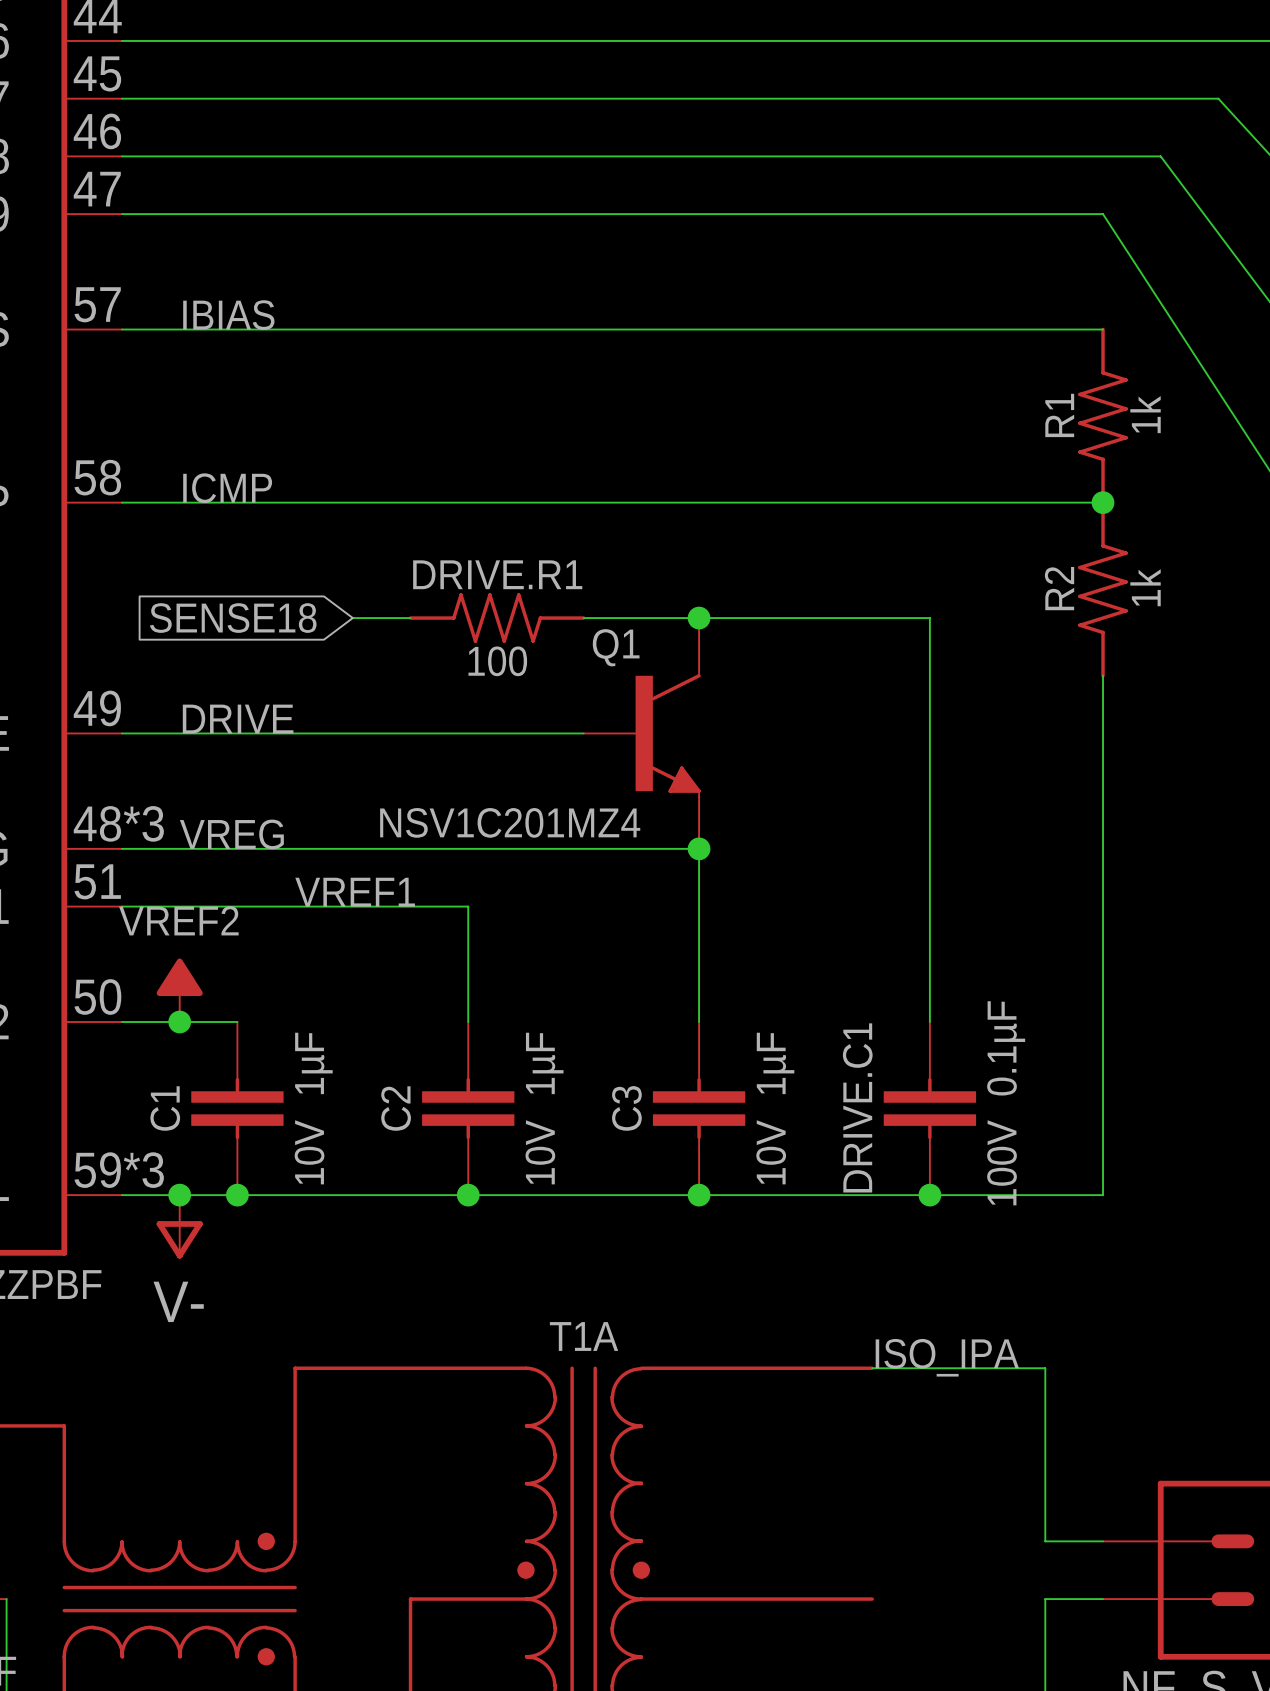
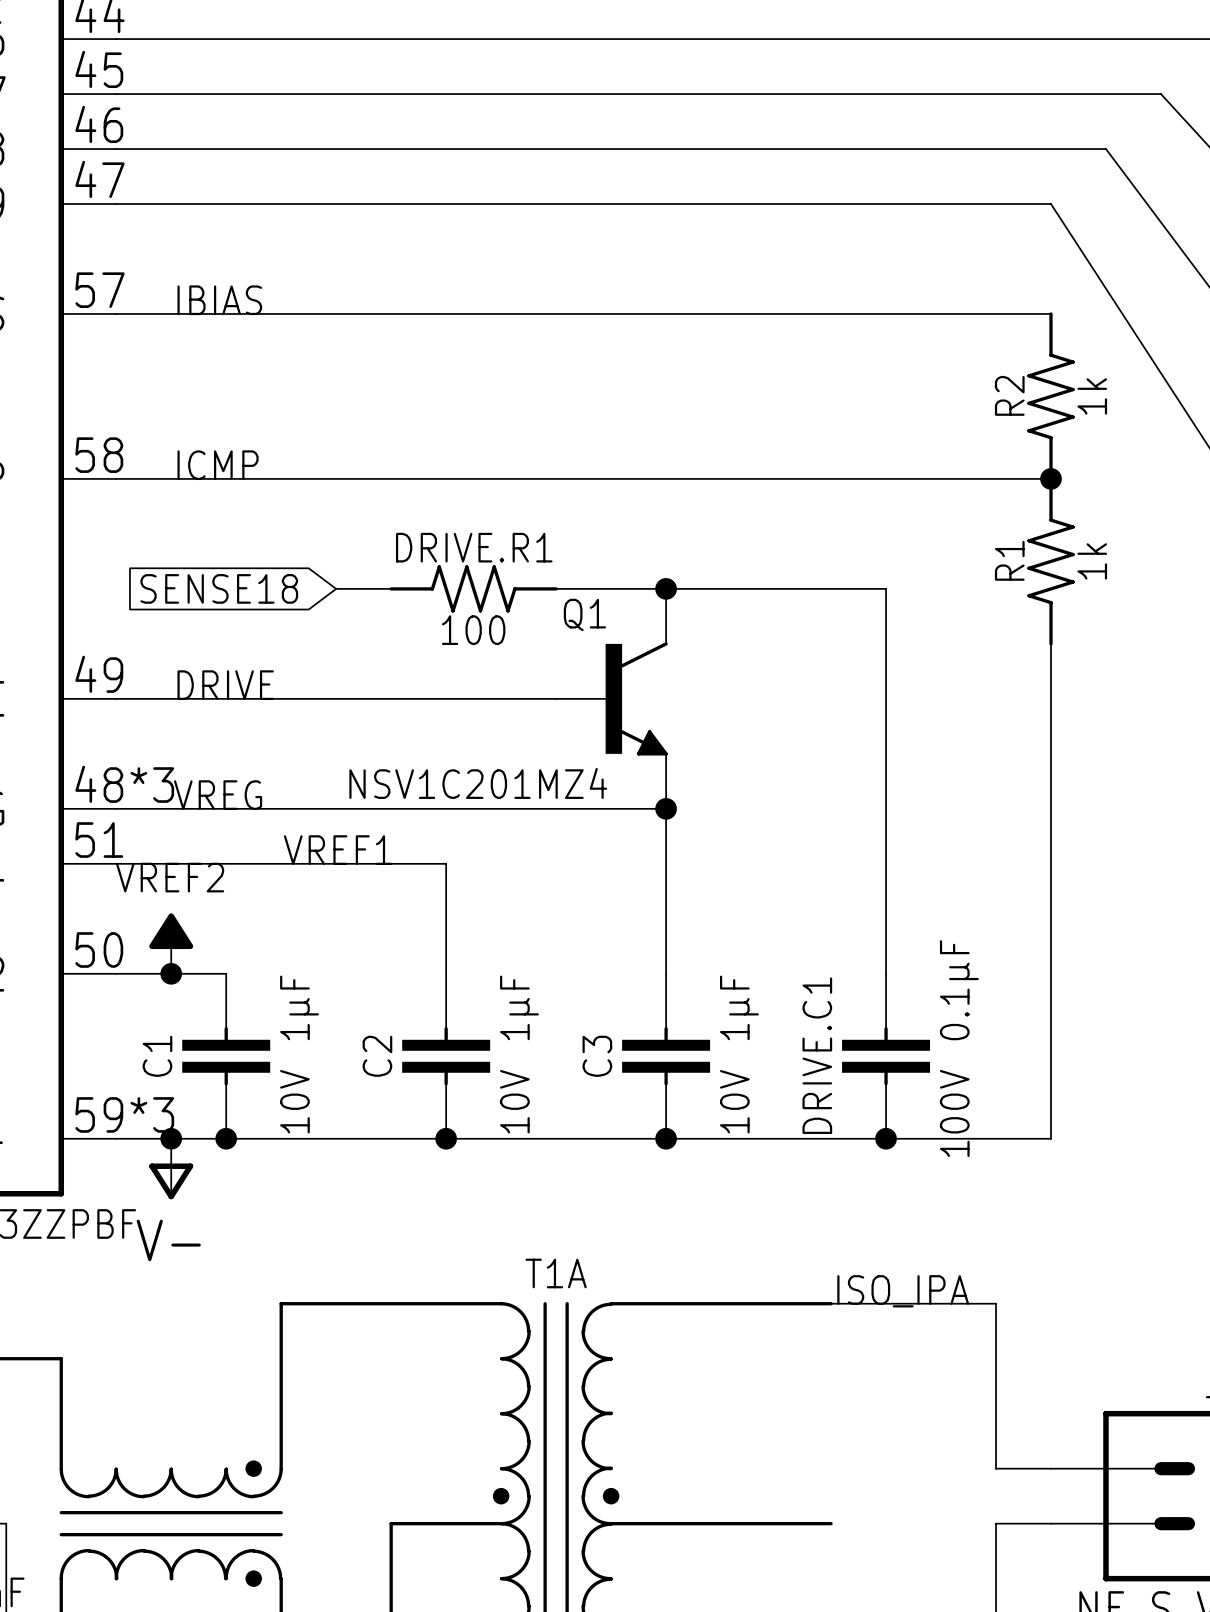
R1 name: R1 (1059, 415) -> R2 (1009, 395)
R2 name: R2 (1059, 588) -> R1 (1009, 560)

